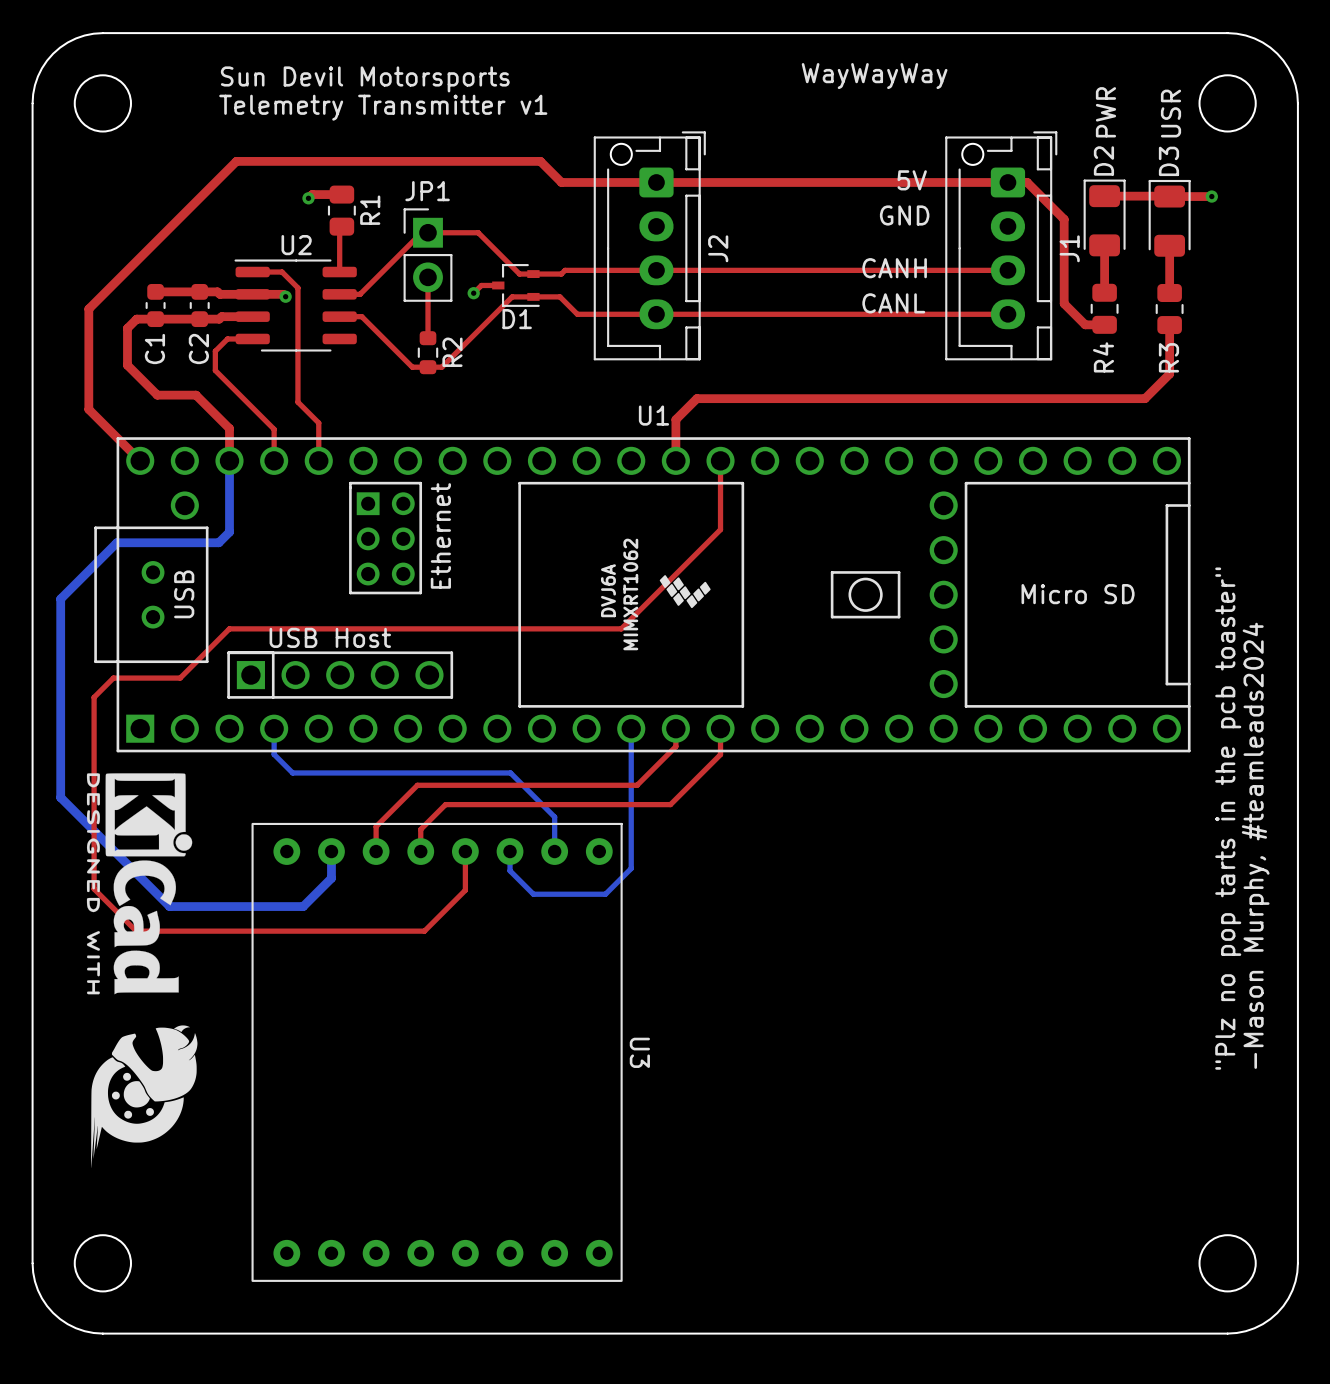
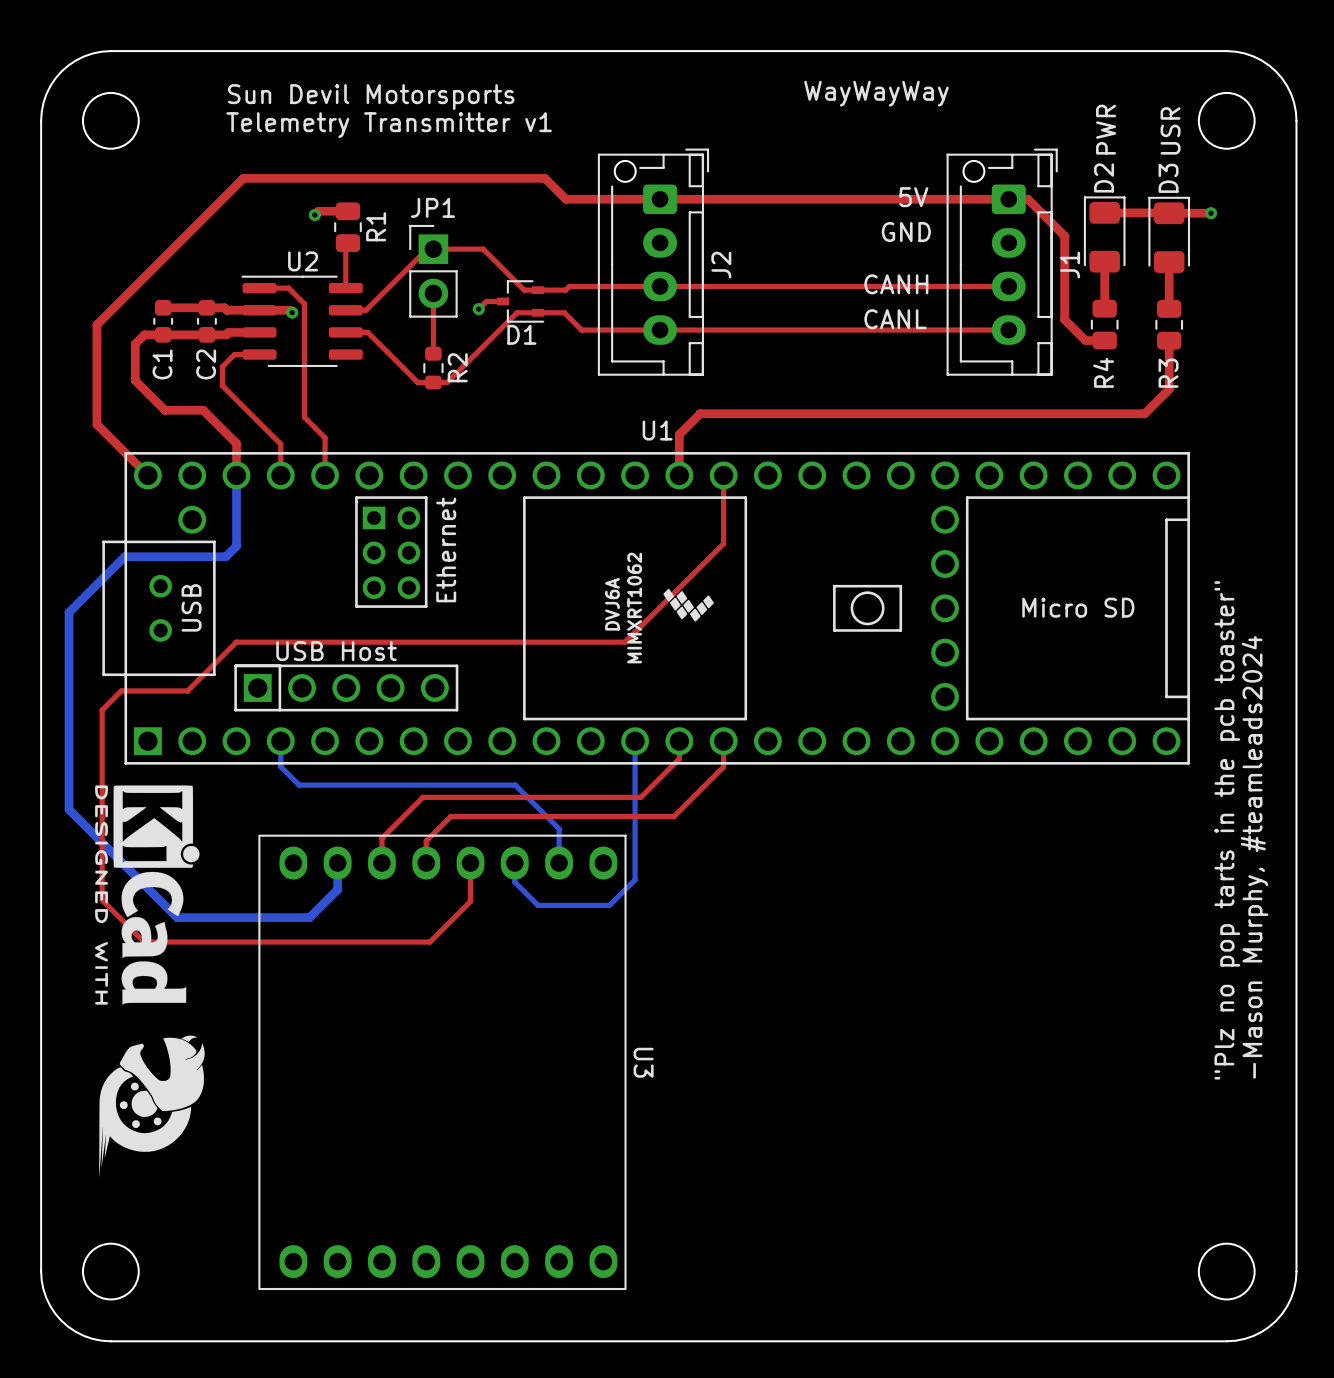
U3 footprint: [251, 822, 623, 1282] -> [258, 834, 627, 1291]

